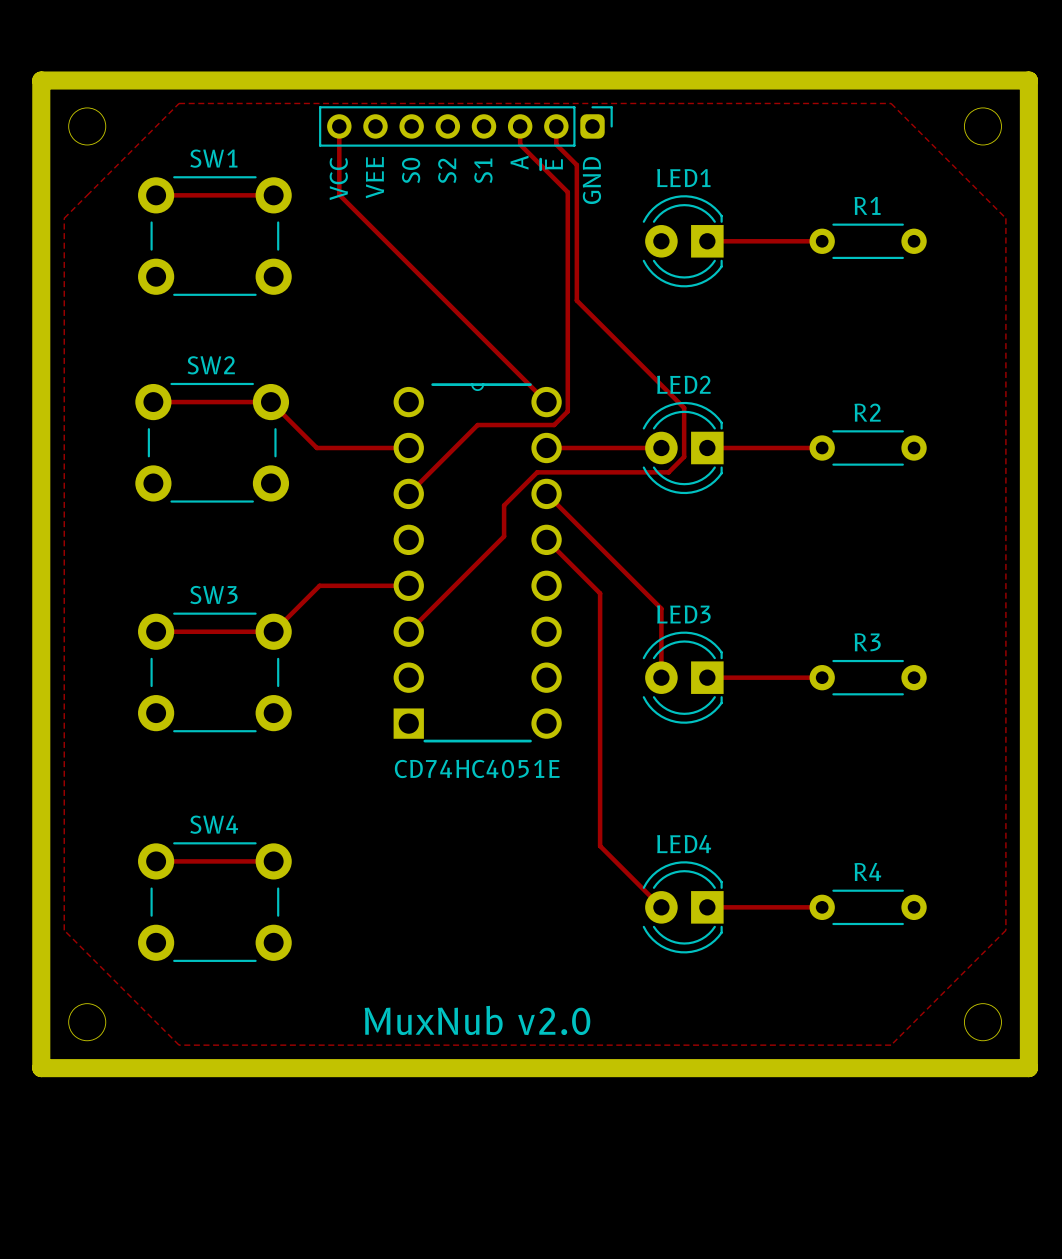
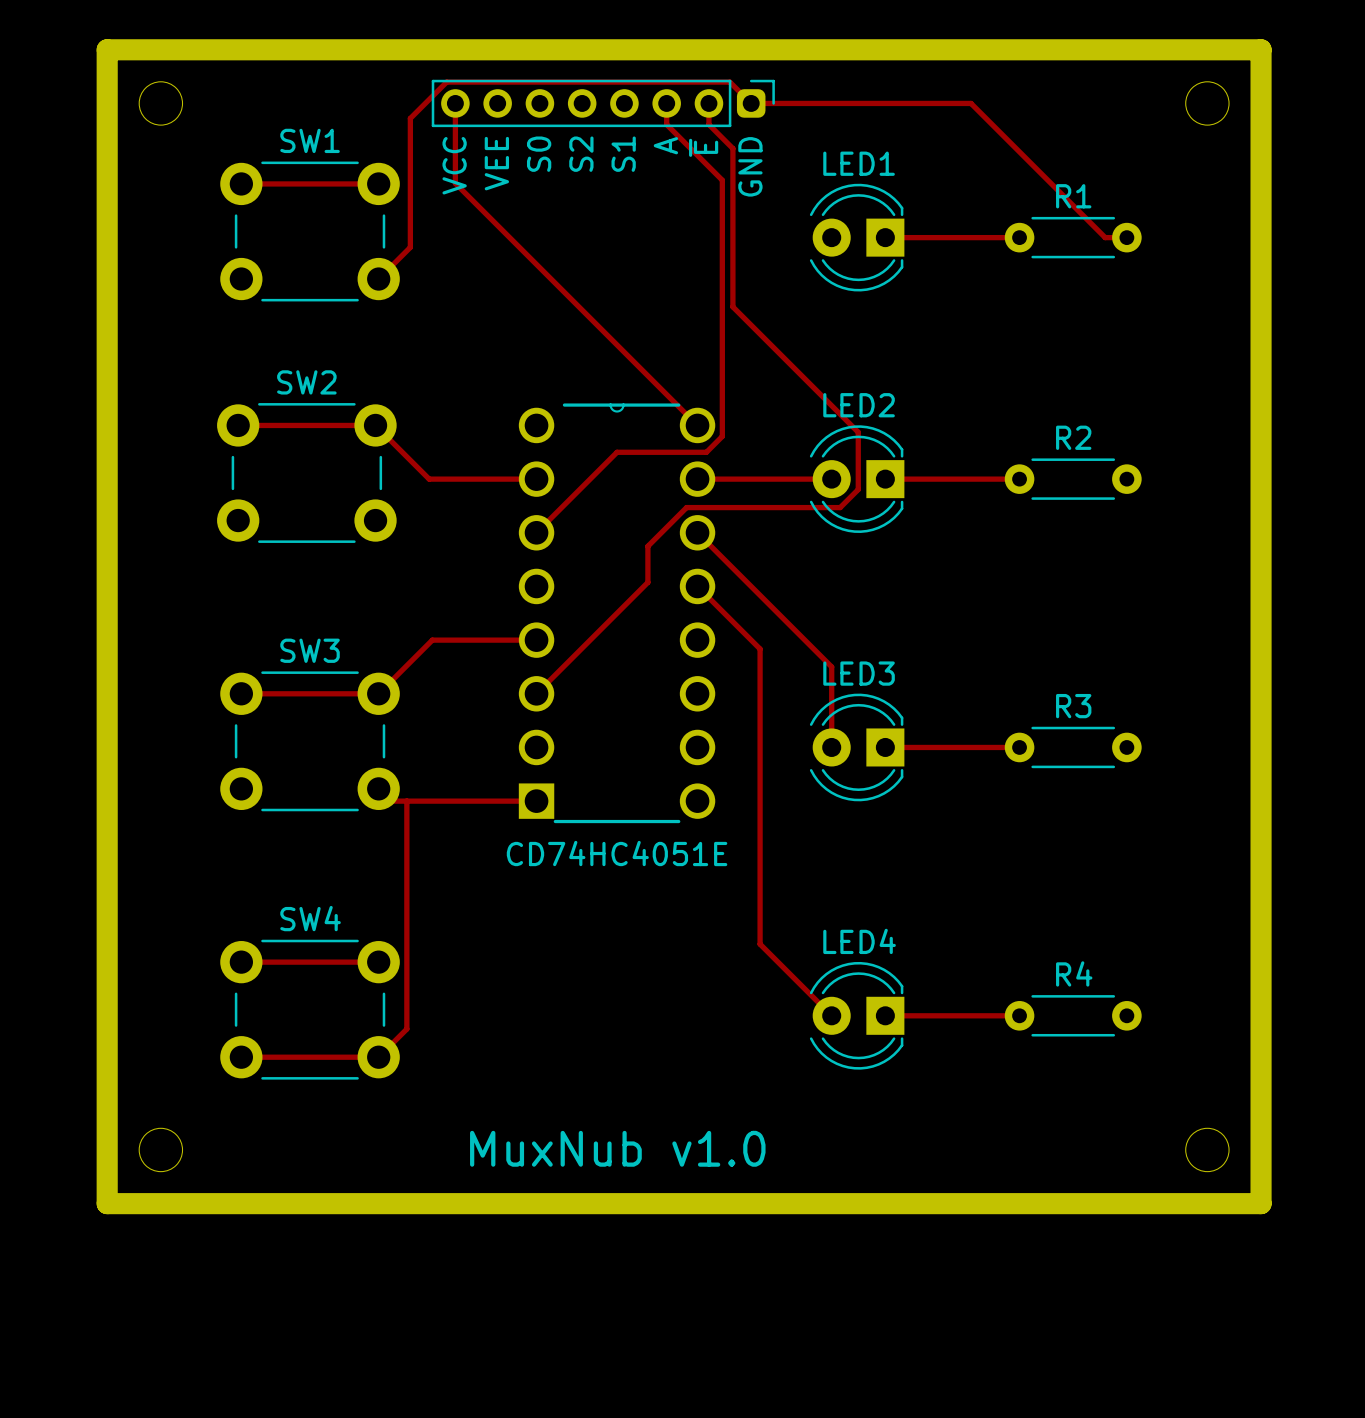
zone outline: (179, 103) (64, 218) (64, 930) (179, 1045) (891, 1045) (1005, 930) (1005, 218) (891, 103) (179, 103) -> none
track: none -> (1126, 237) (1105, 237) (971, 103) (751, 103) (729, 82) (446, 82) (410, 118) (410, 247) (378, 279)
track: none -> (378, 788) (390, 801) (536, 801)
track: none -> (406, 801) (406, 1029) (378, 1057) (241, 1057)
text: MuxNub v2.0 (477, 1020) -> MuxNub v1.0 (617, 1148)

